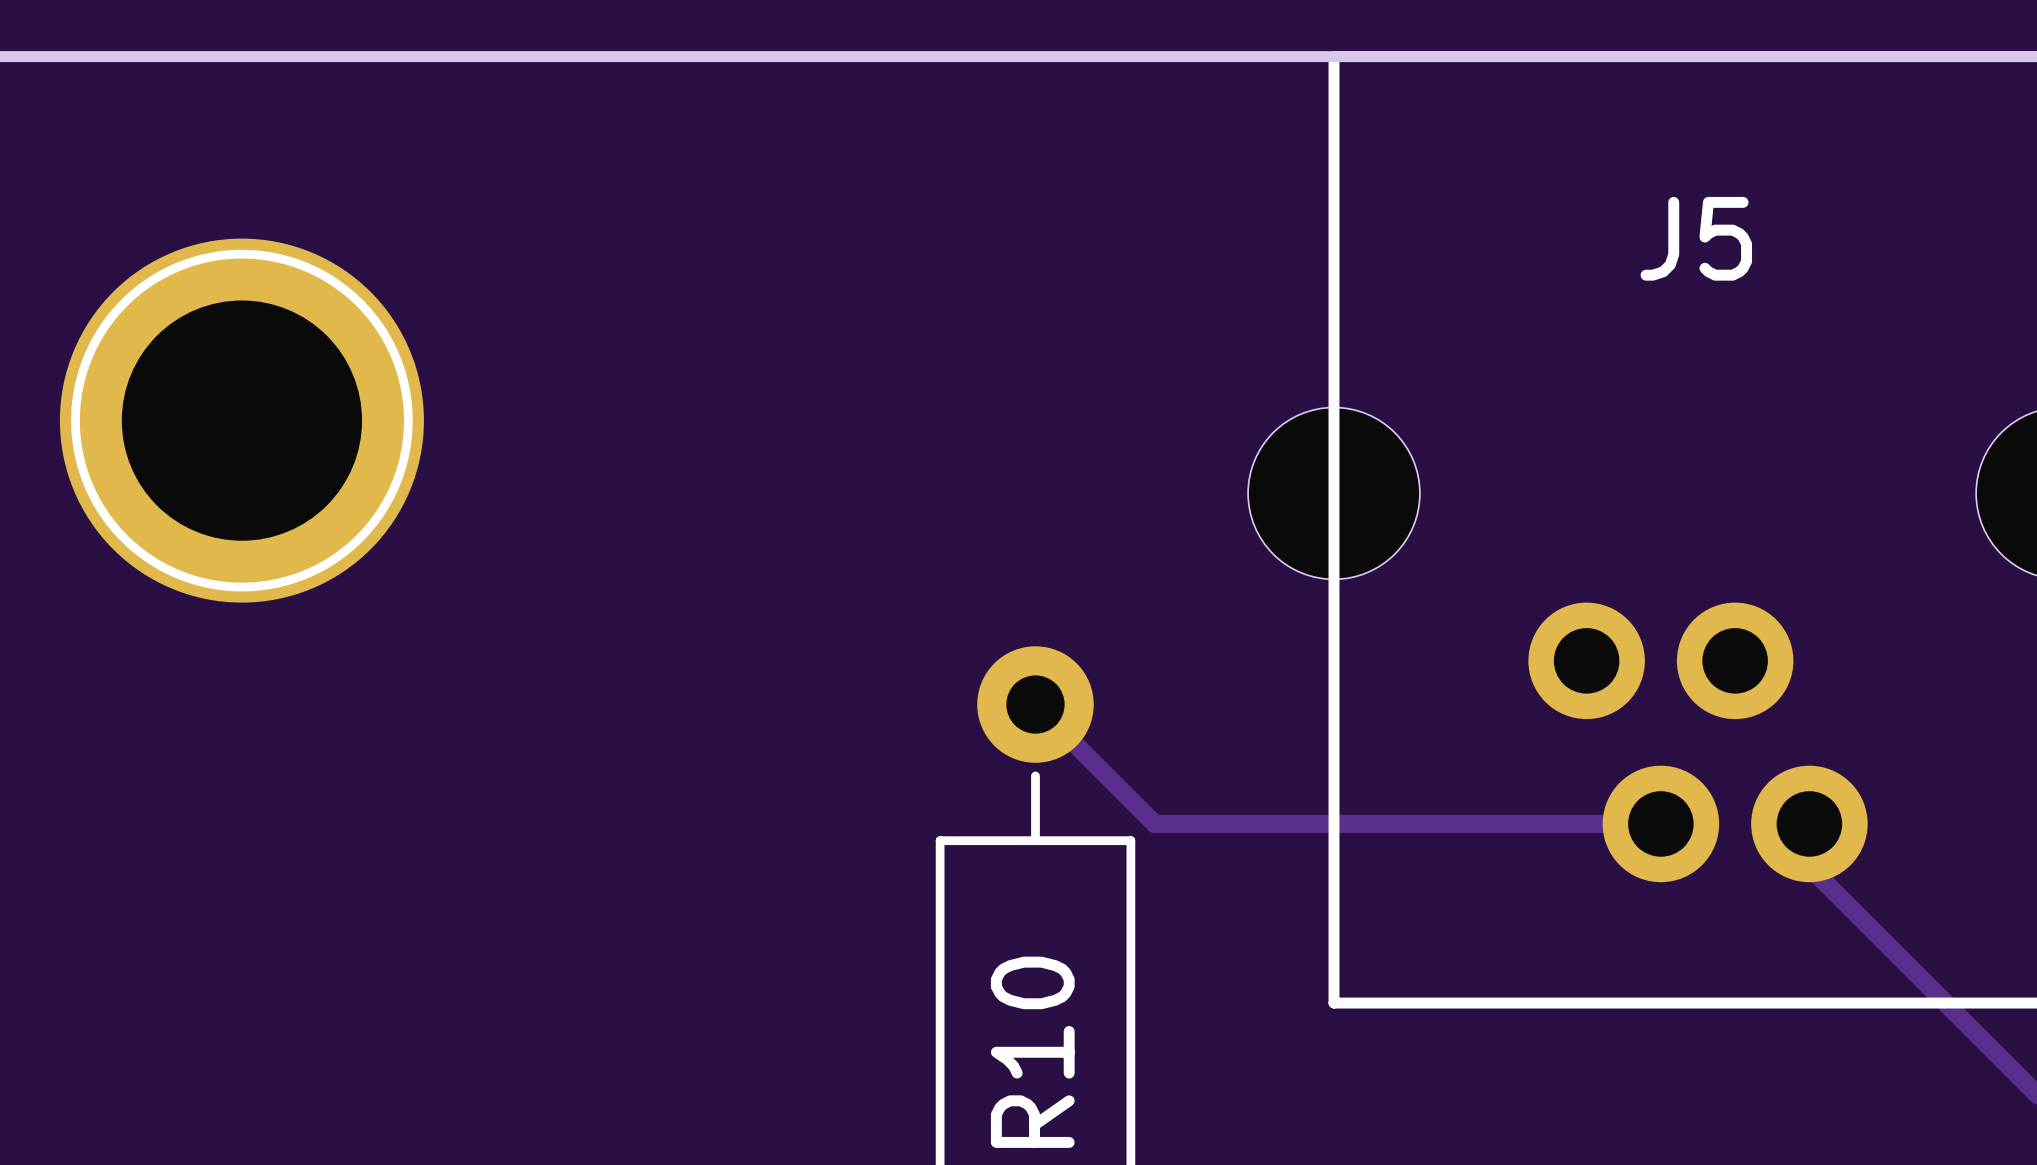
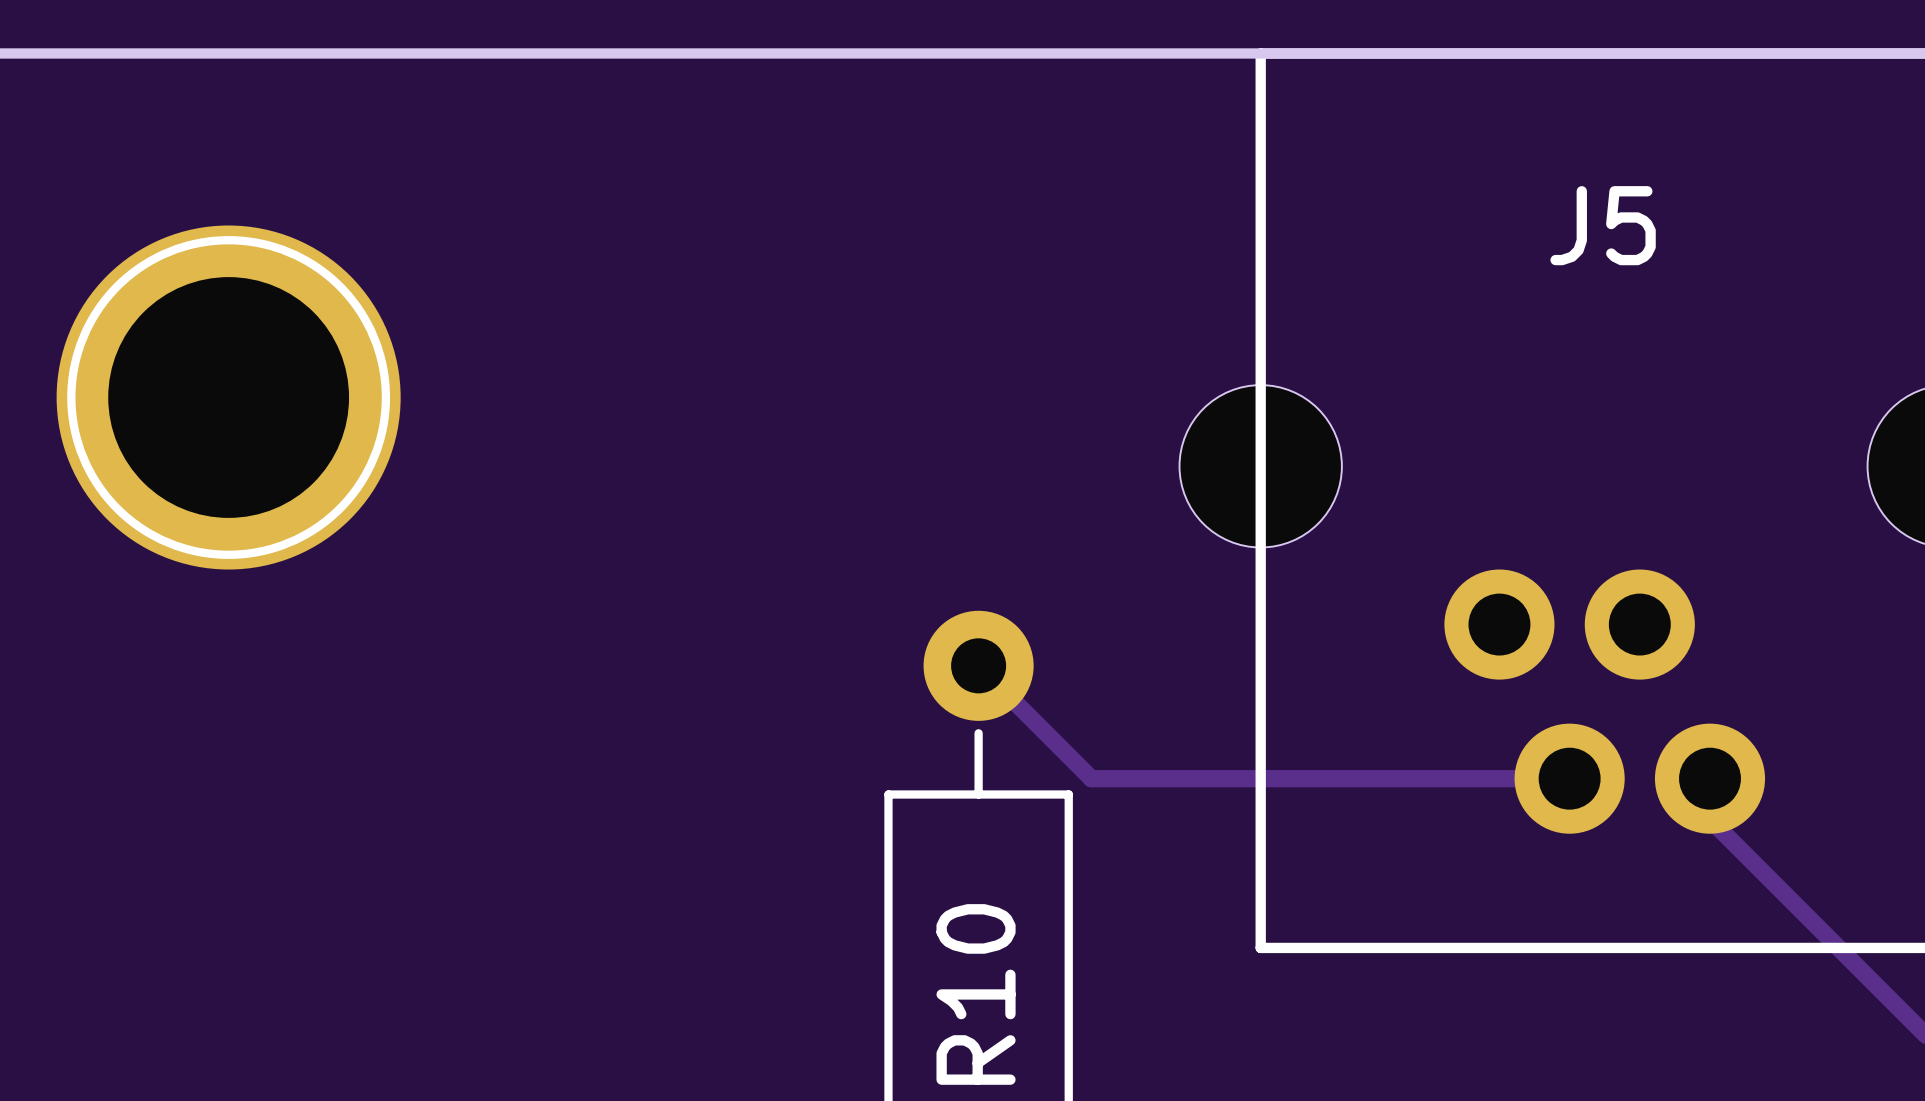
part footprint: [59, 238, 424, 603] -> [56, 225, 401, 570]

